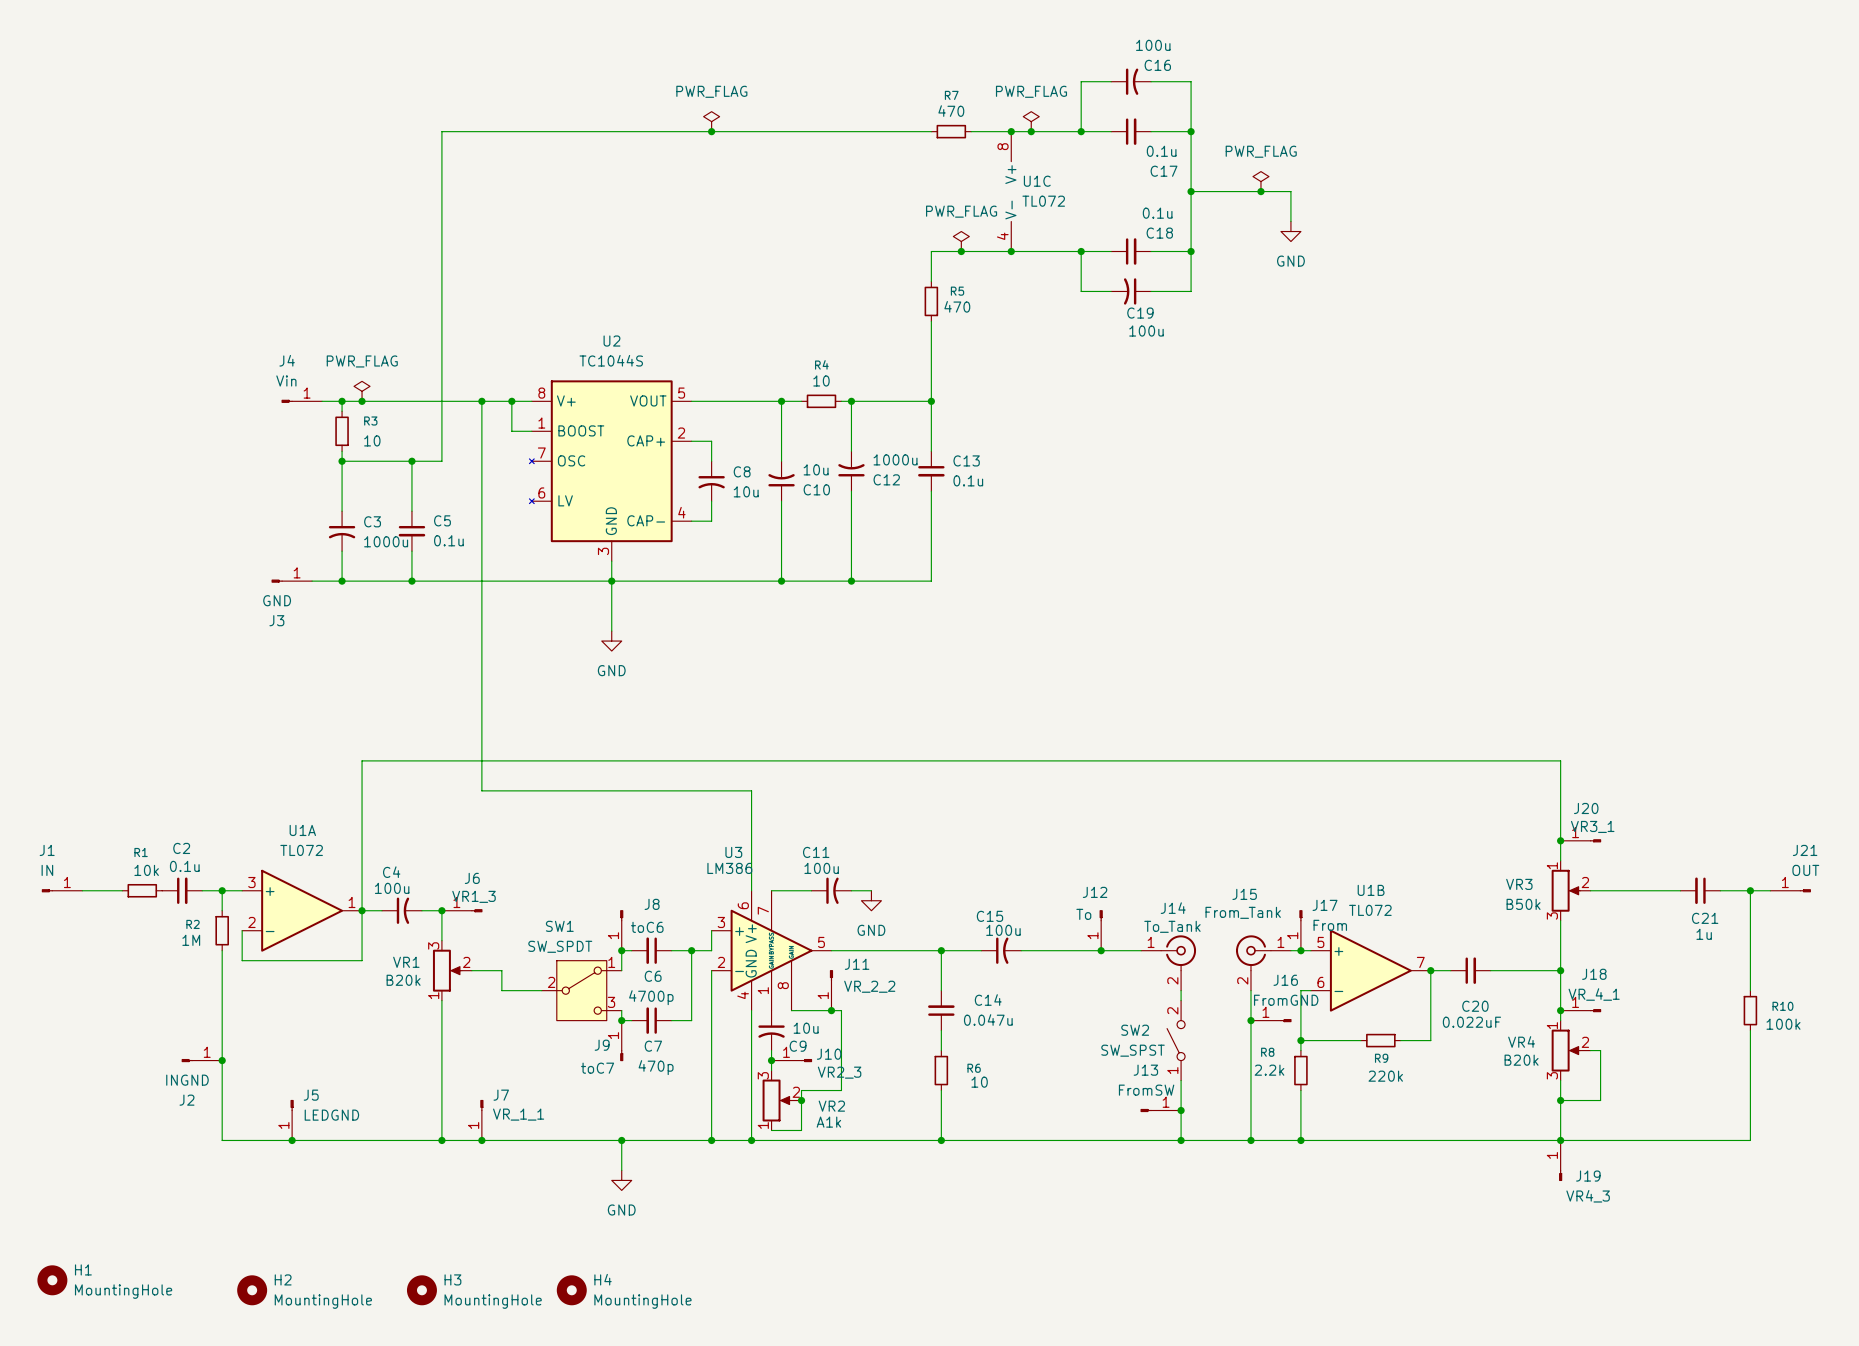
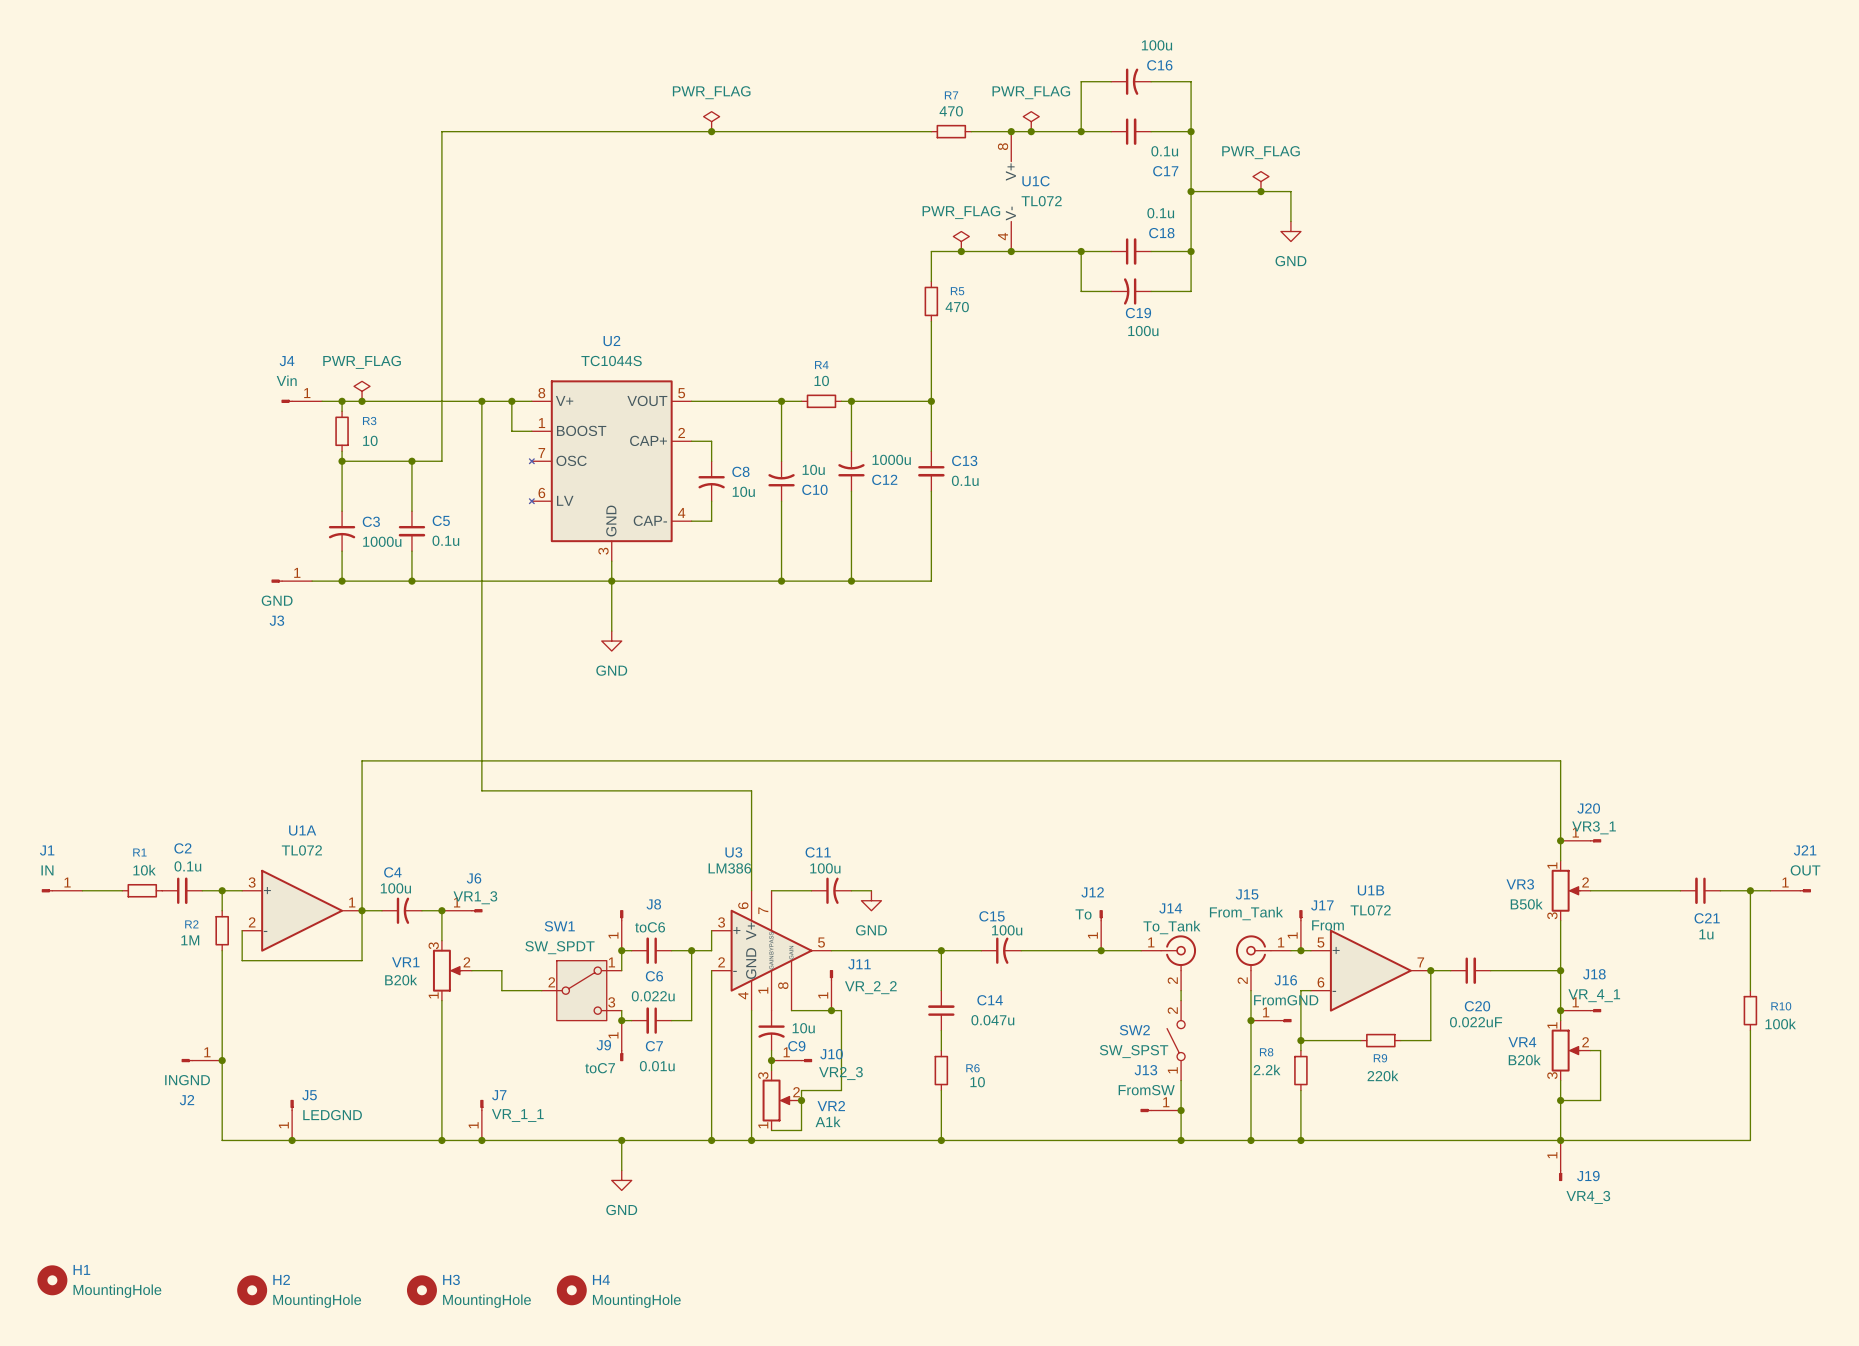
C6 value: 4700p (651, 997) -> 0.022u (653, 996)
C7 value: 470p (656, 1067) -> 0.01u (657, 1066)

